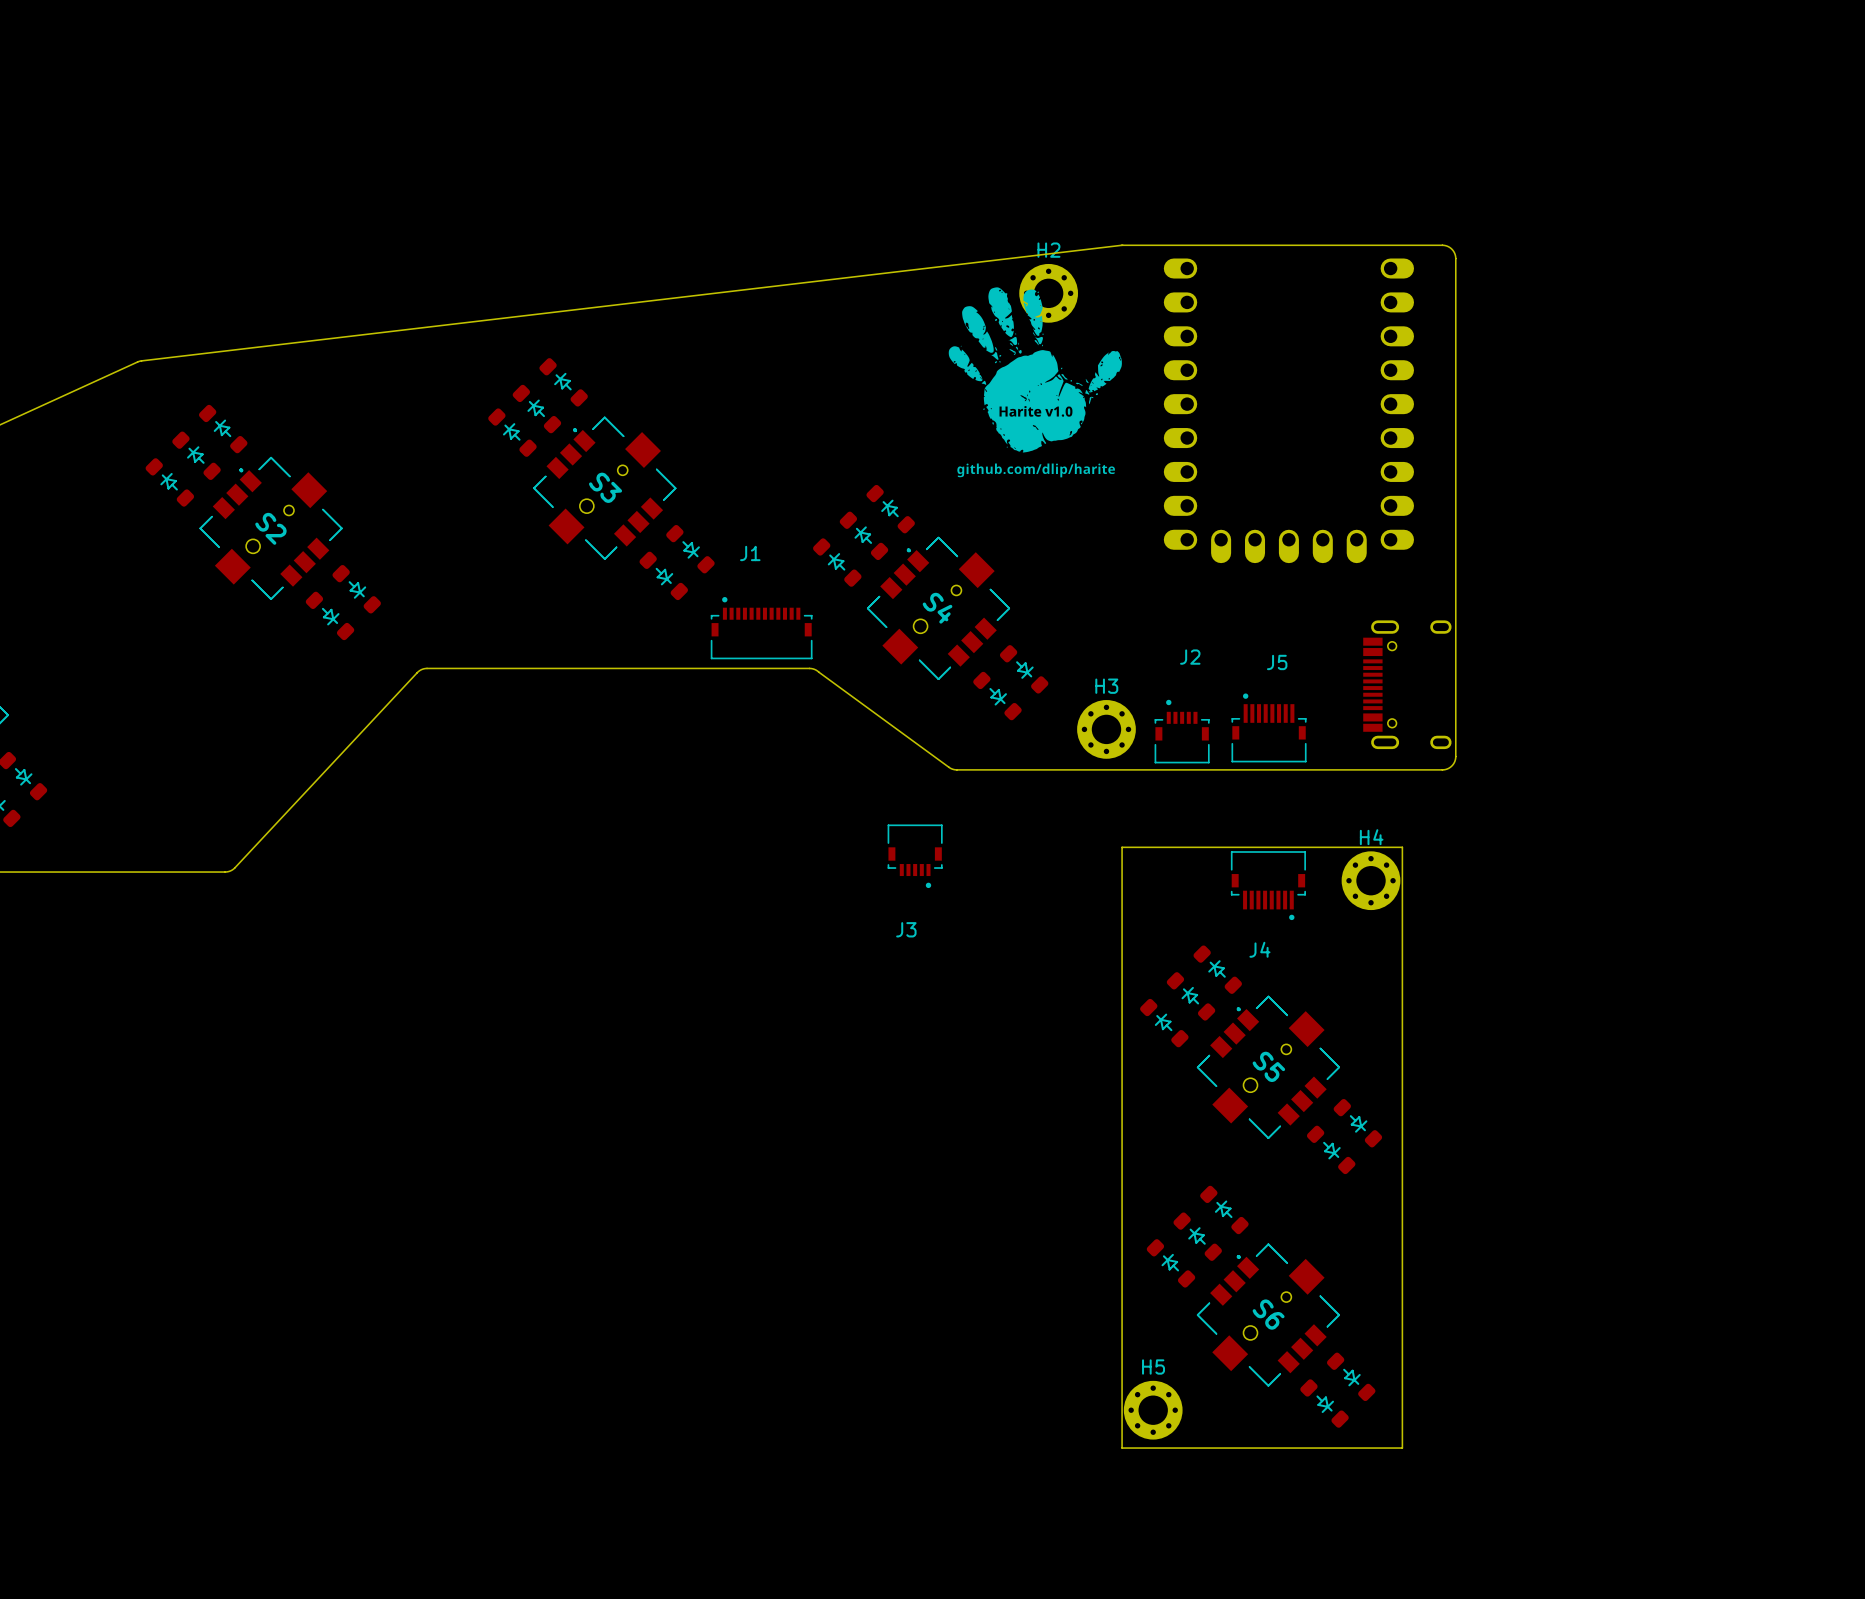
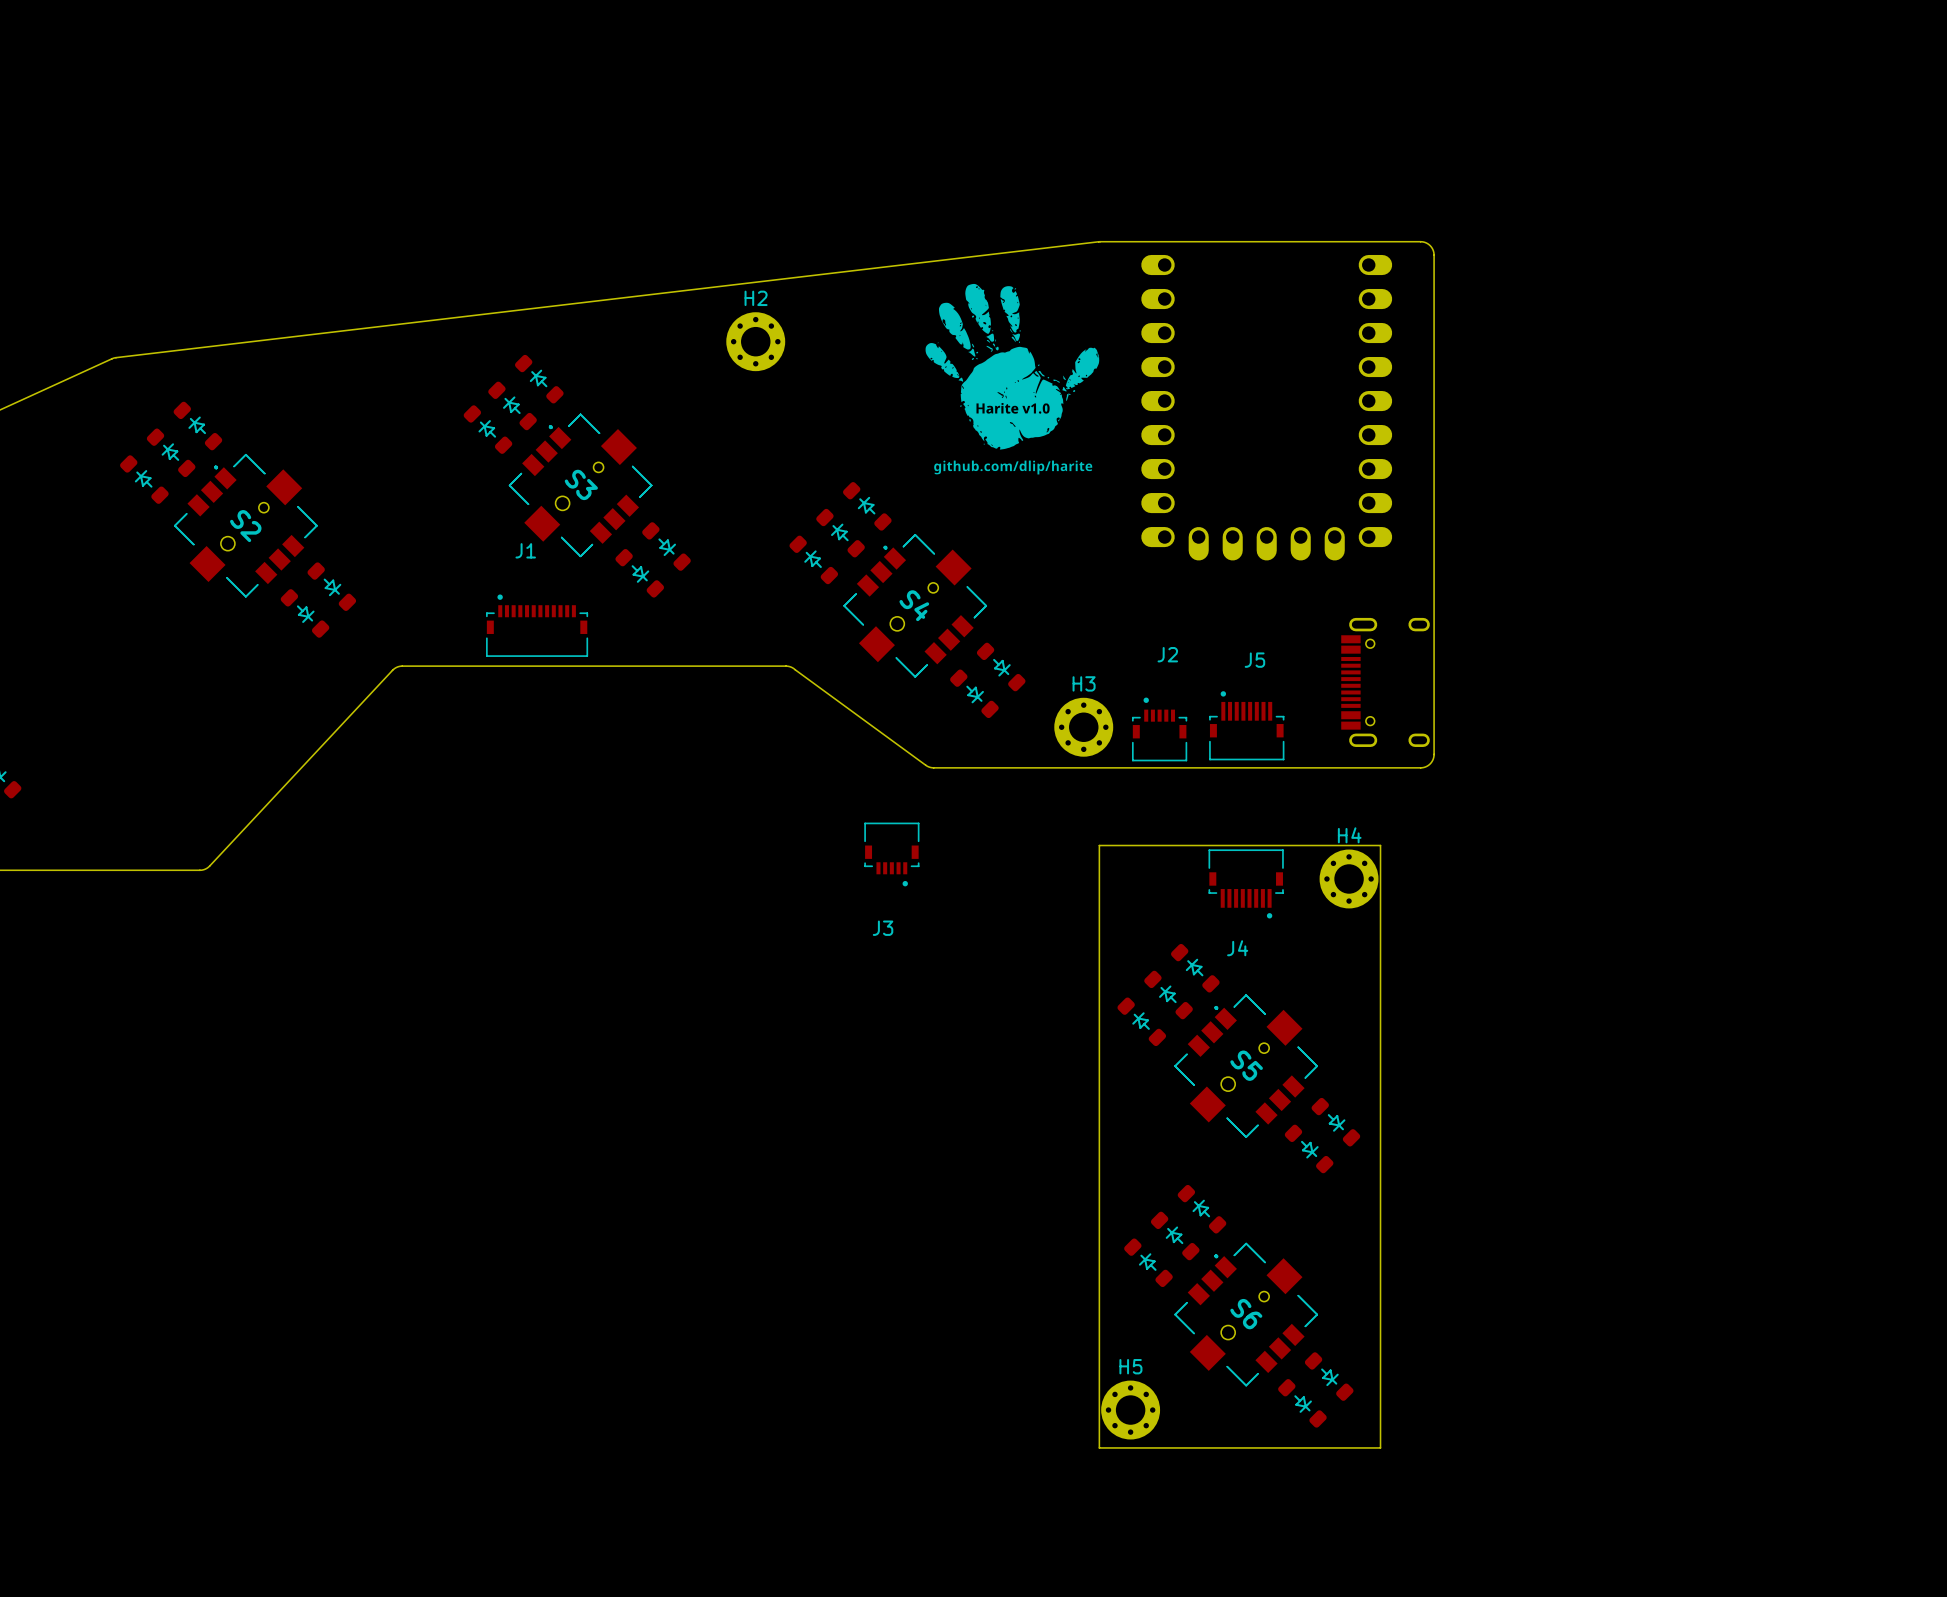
H2 position: (1048, 293) -> (755, 341)
J1 position: (761, 628) -> (537, 625)

